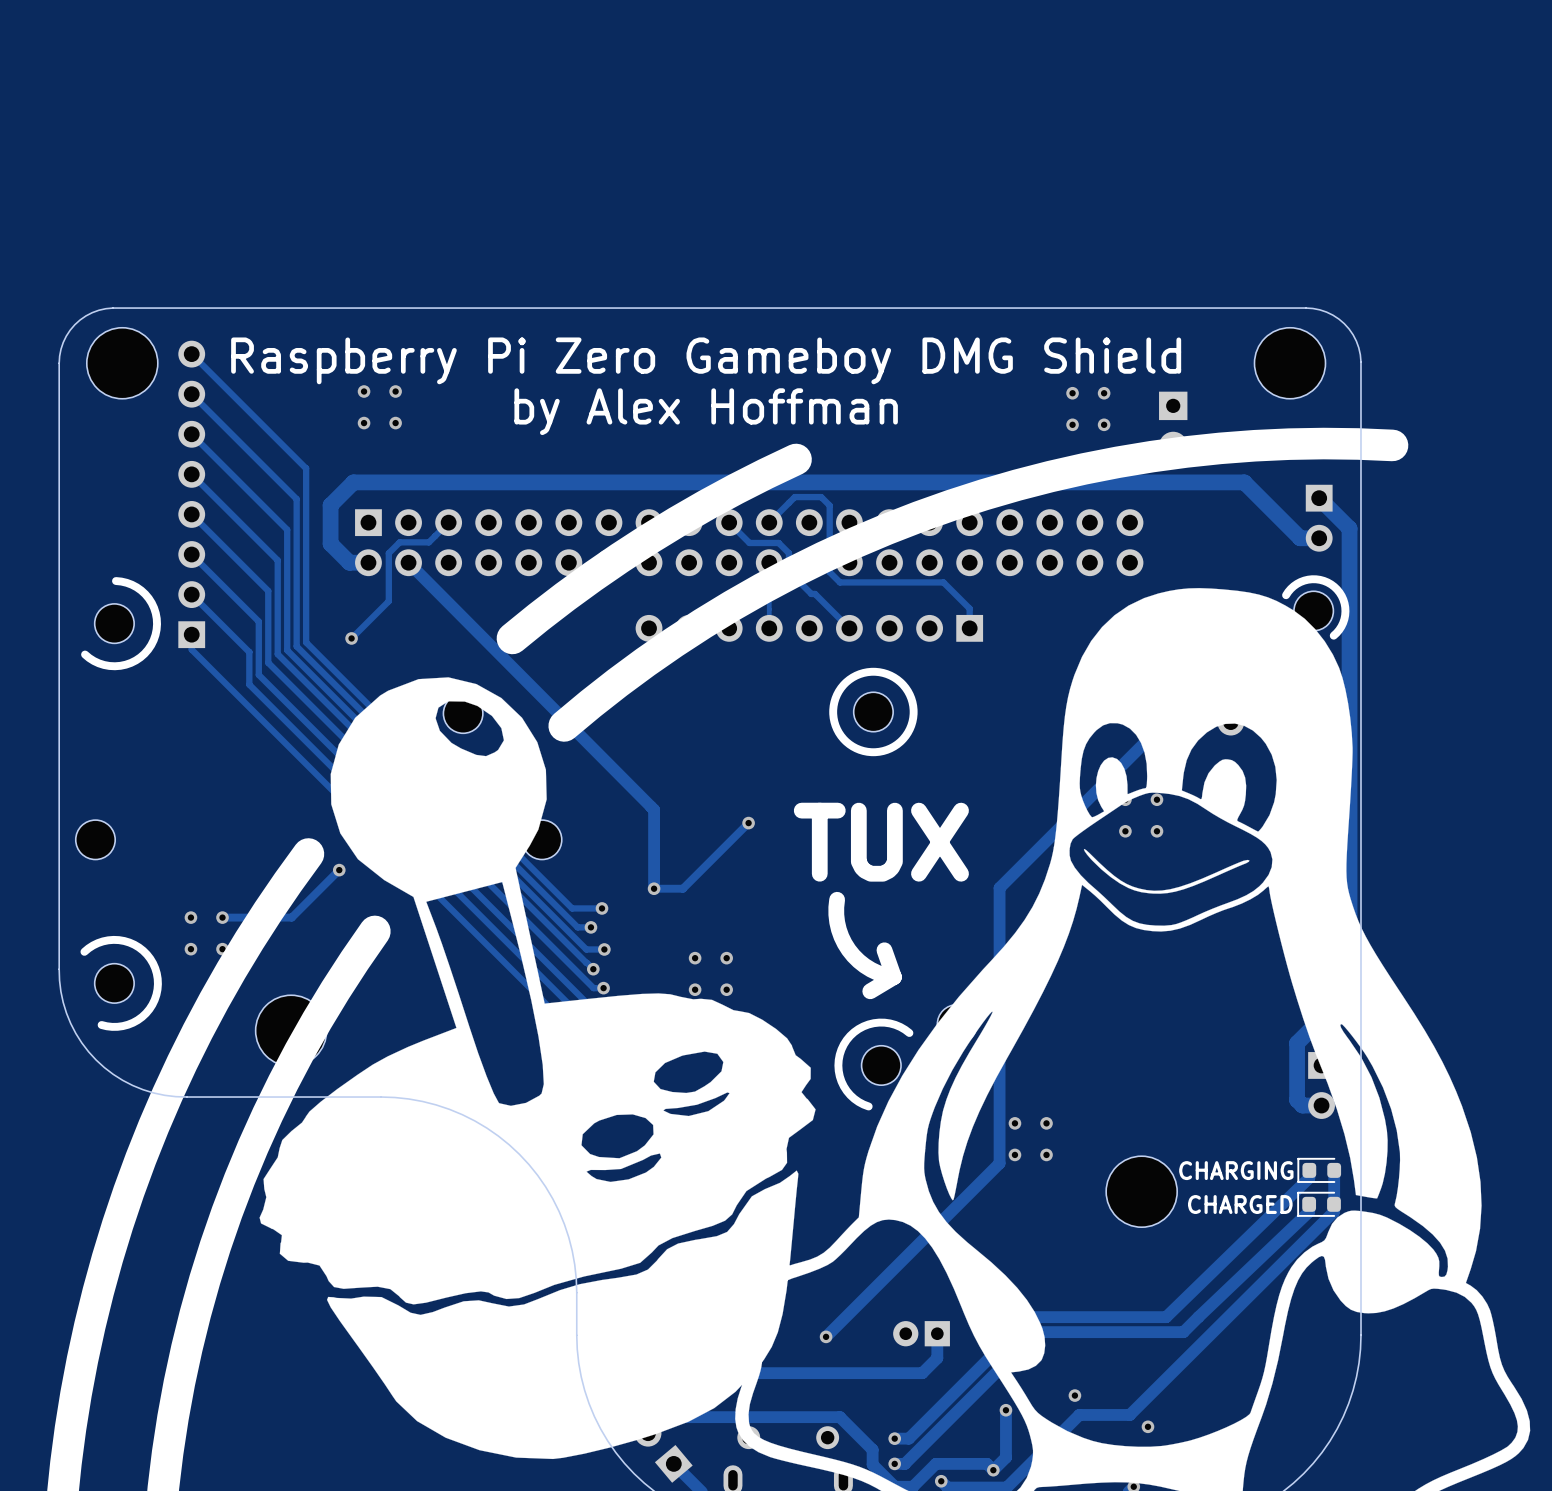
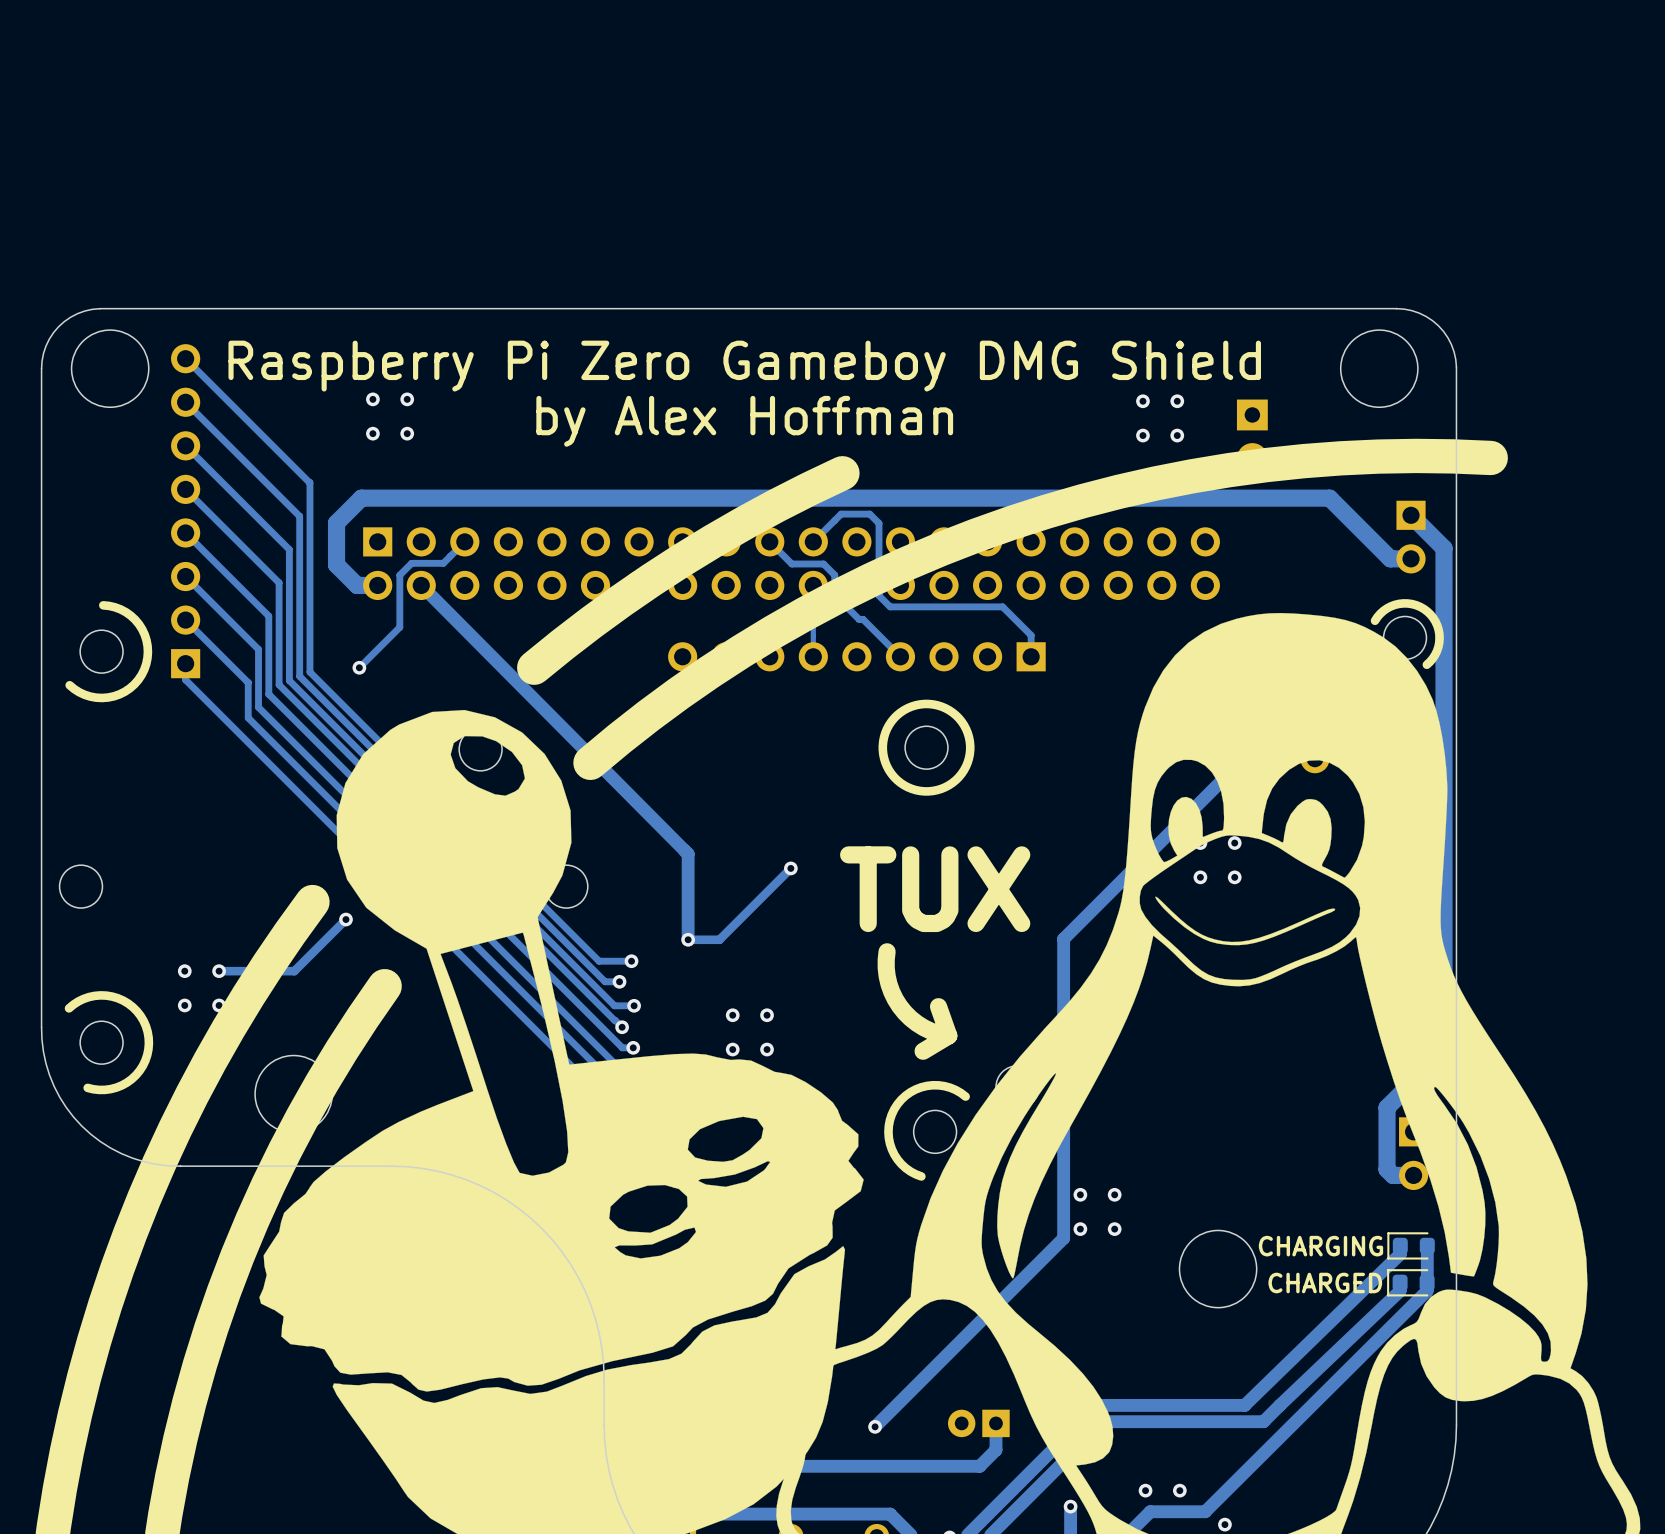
via: none -> (1179, 1490)

